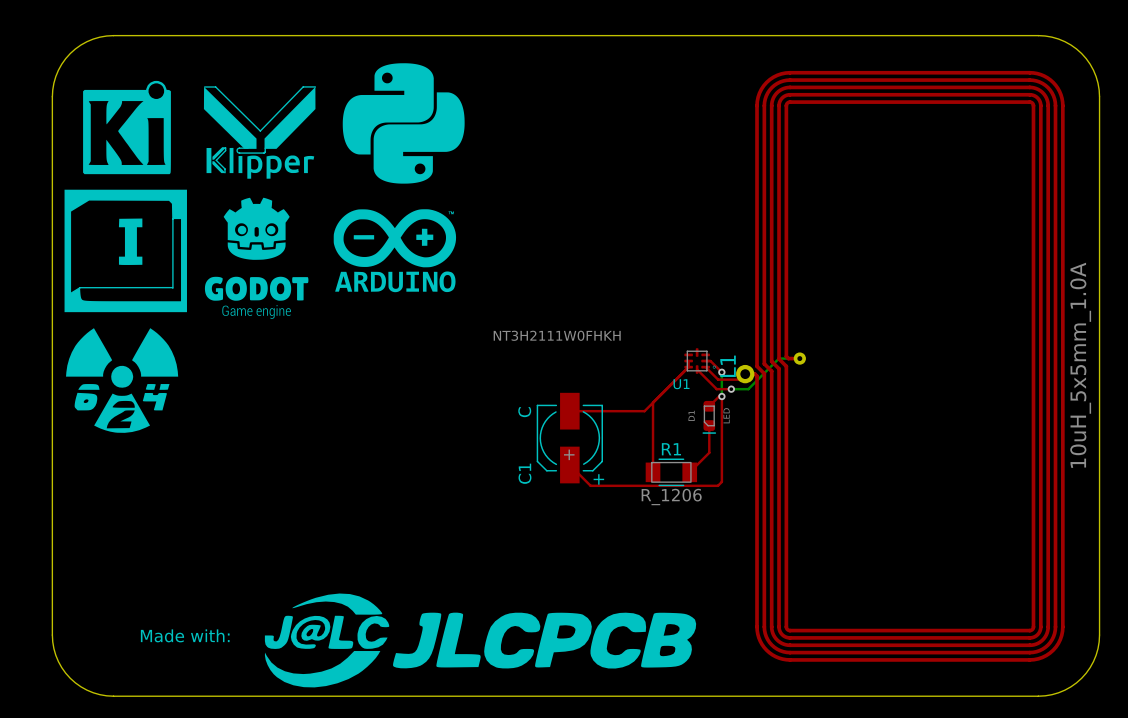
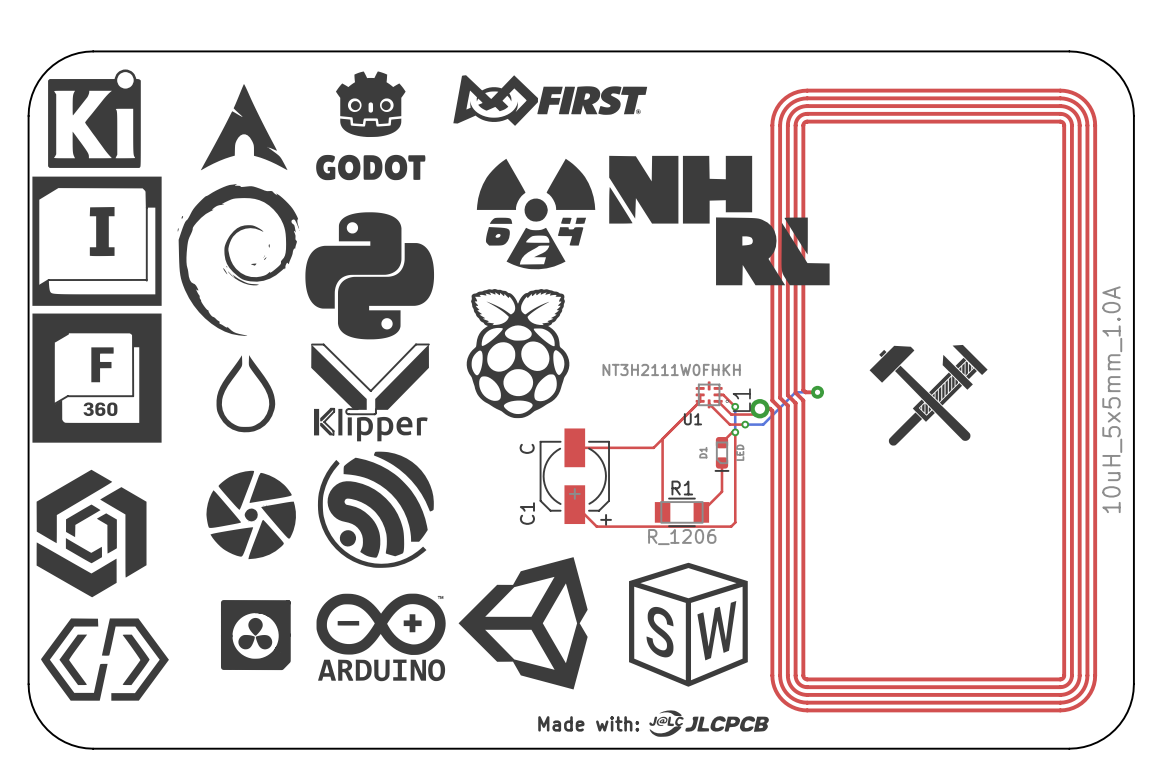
drawing: none -> [316, 71, 426, 181]
drawing: none -> [453, 75, 648, 126]
drawing: none -> [177, 84, 300, 336]
drawing position: (403, 123) -> (369, 275)
drawing position: (126, 127) -> (94, 118)
drawing position: (259, 132) -> (370, 392)
drawing: none -> [476, 155, 830, 286]
drawing: [204, 197, 309, 319] -> none
drawing: [333, 209, 457, 293] -> none
drawing position: (125, 250) -> (97, 241)
drawing: none -> [466, 289, 570, 419]
drawing: none -> [32, 313, 162, 443]
drawing: none -> [869, 344, 988, 446]
drawing: none -> [216, 355, 276, 433]
drawing: [66, 328, 179, 433] -> none
U1 value position: NT3H2111W0FHKH (557, 335) -> NT3H2111W0FHKH (671, 369)
drawing: none -> [317, 451, 434, 568]
drawing: none -> [36, 469, 147, 598]
drawing: none -> [206, 470, 296, 560]
drawing: none -> [316, 557, 588, 690]
drawing: none -> [629, 562, 748, 687]
drawing: none -> [220, 600, 291, 671]
drawing: none -> [41, 618, 169, 701]
drawing: [264, 593, 697, 688] -> none
text: Made with: (185, 635) -> none
drawing: none -> [649, 710, 769, 737]
text: none -> Made with: (588, 723)

